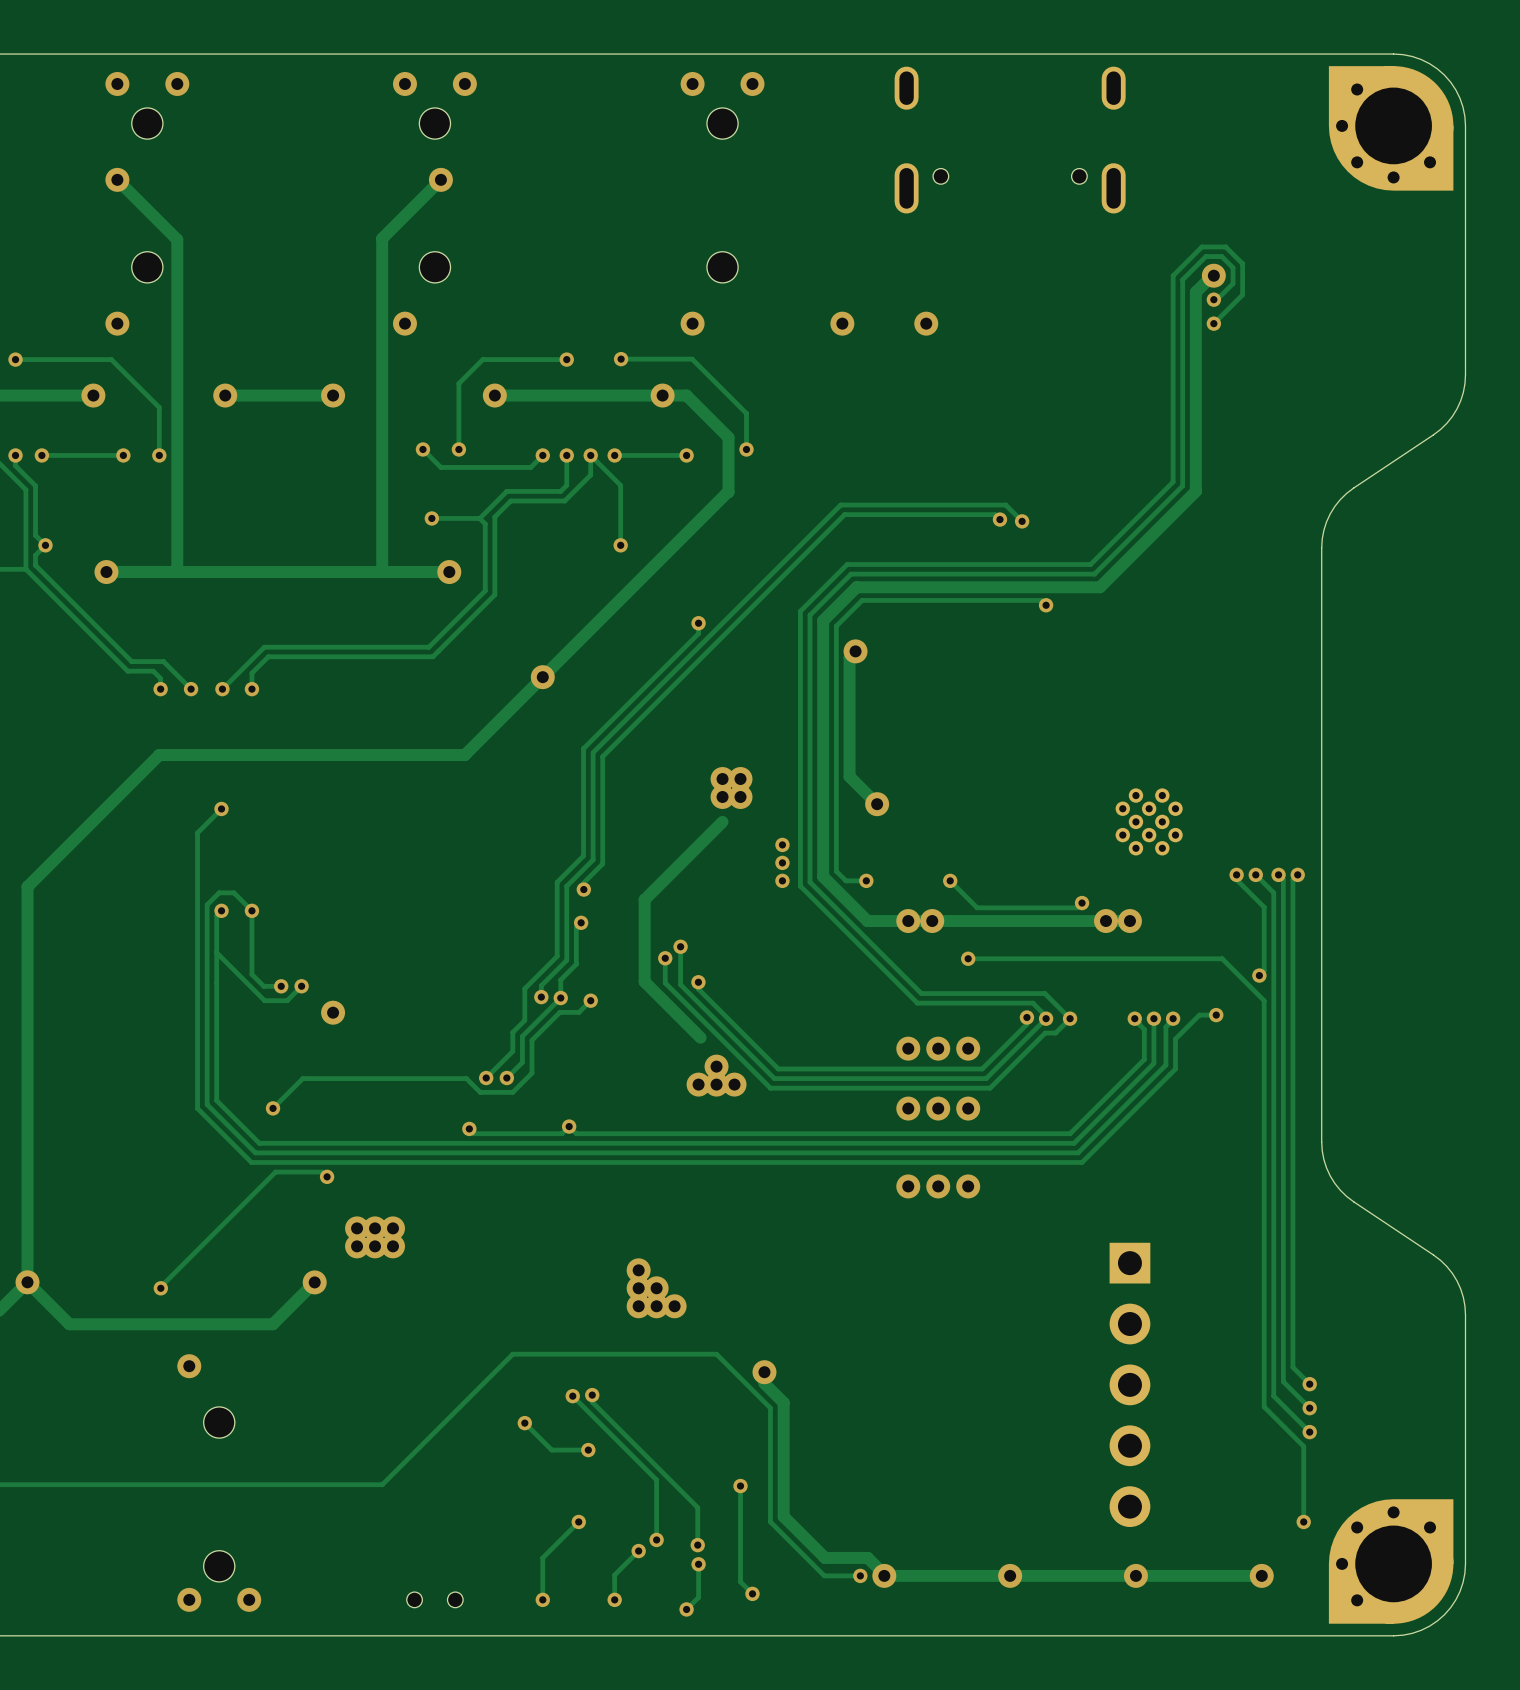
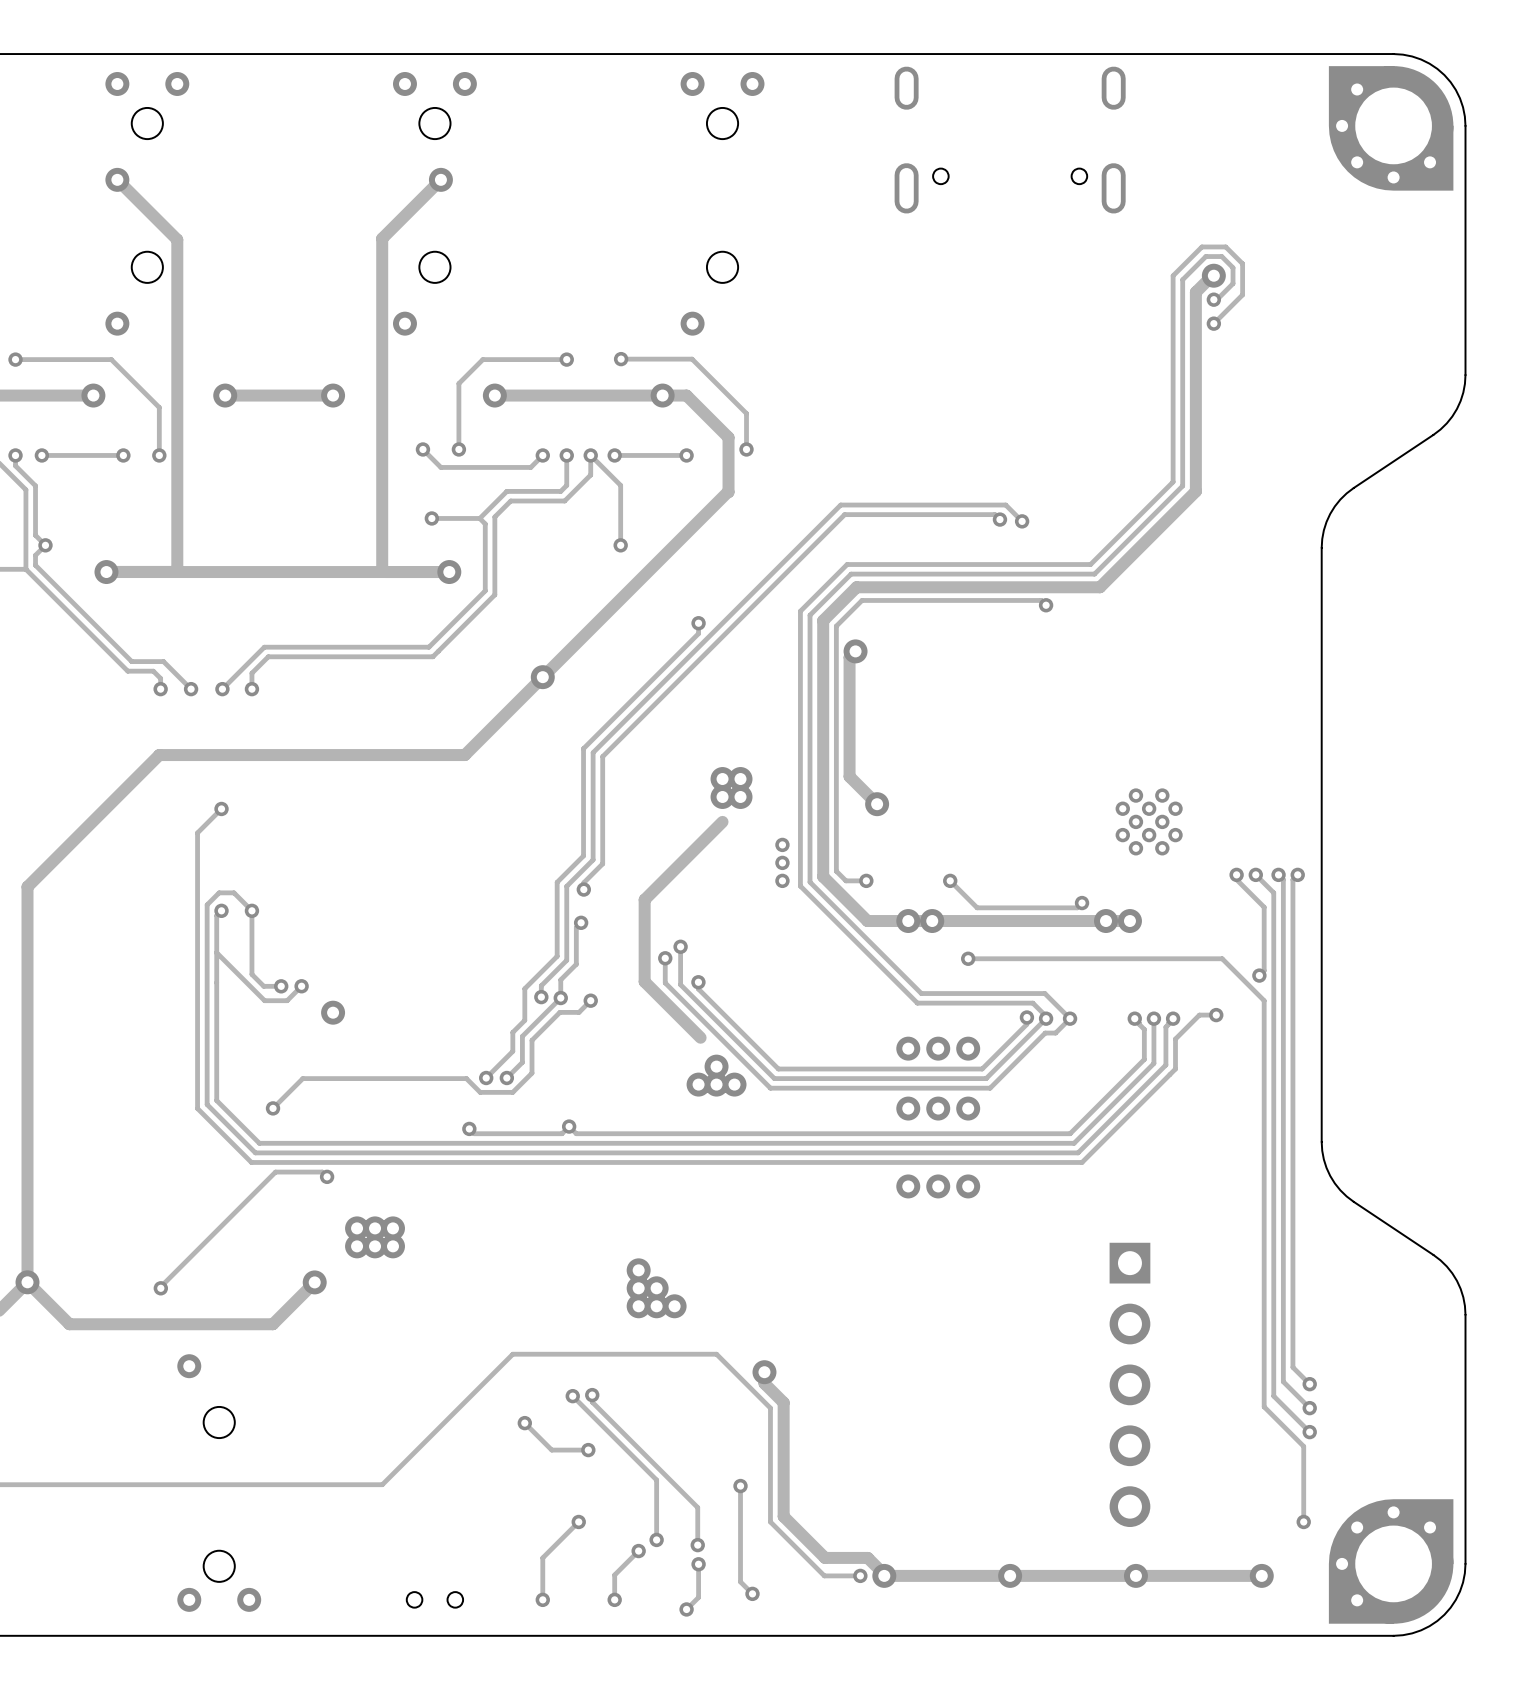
via: (842, 323) -> none
via: (926, 323) -> none

